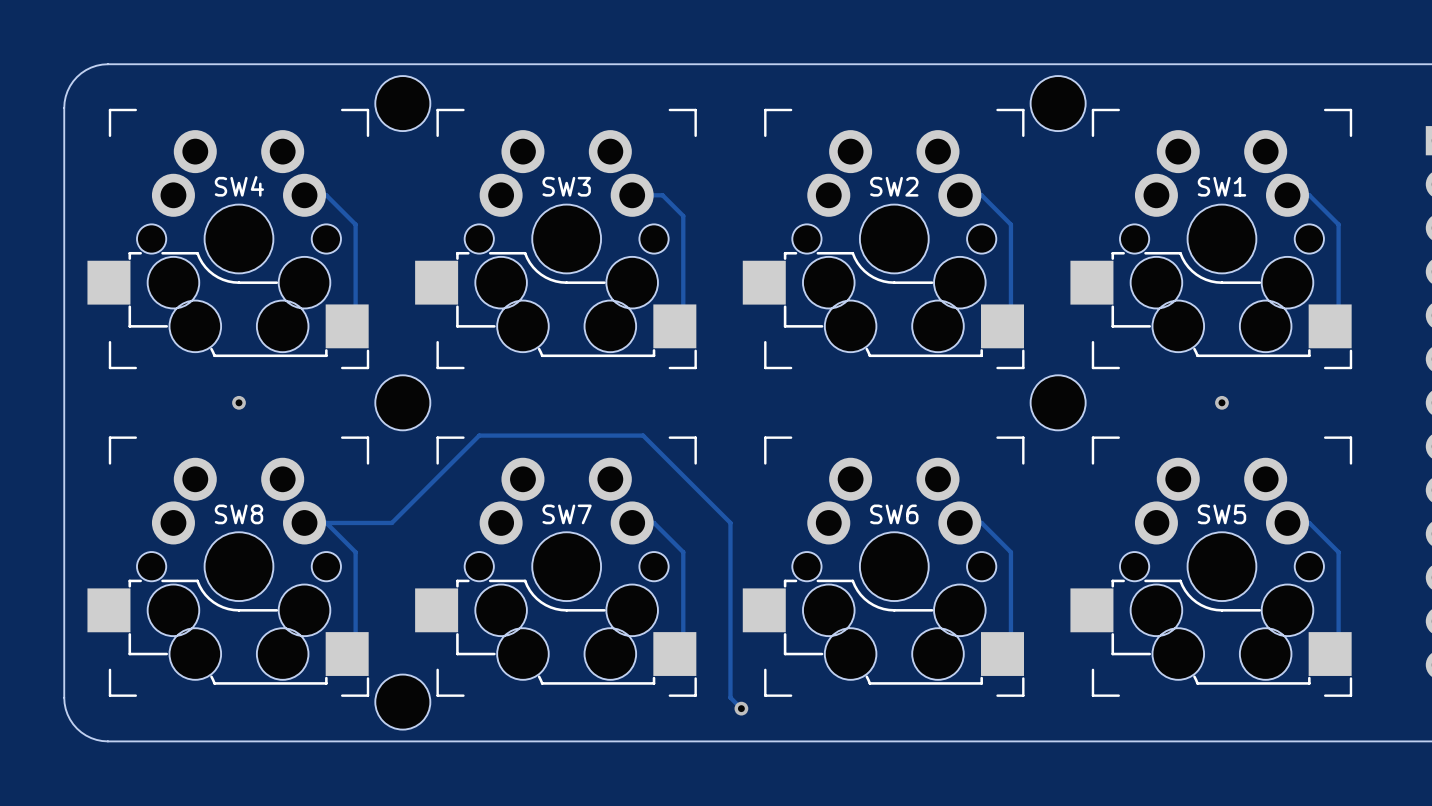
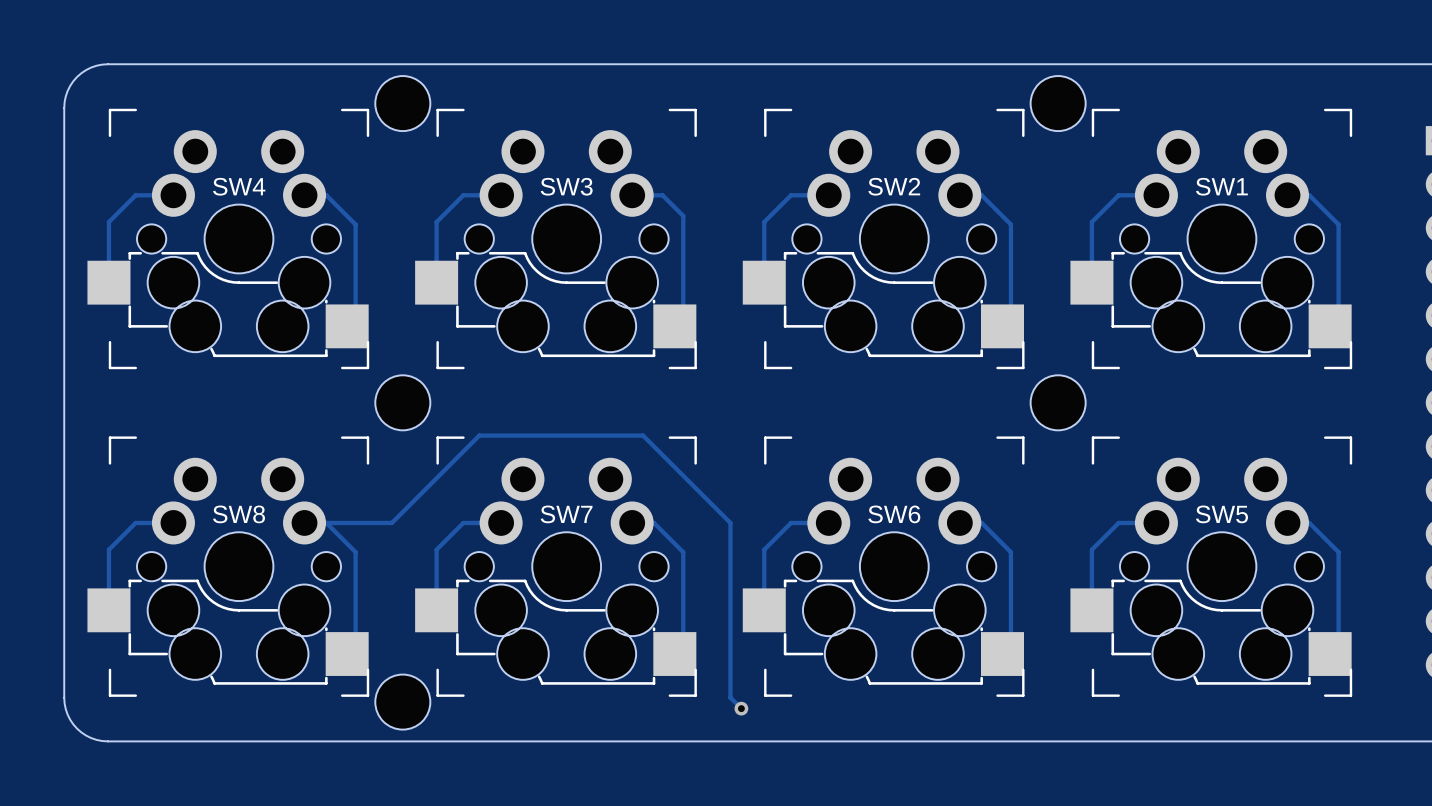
SW4 footprint: [87, 108, 370, 370] -> [87, 108, 370, 370]
SW3 footprint: [415, 108, 697, 370] -> [415, 108, 697, 370]
SW2 footprint: [742, 108, 1025, 370] -> [742, 108, 1025, 370]
SW1 footprint: [1070, 108, 1353, 370] -> [1070, 108, 1353, 370]
track: none -> (173, 195) (135, 195) (108, 222) (108, 282)
track: none -> (501, 195) (463, 195) (436, 222) (436, 282)
track: none -> (828, 195) (791, 195) (764, 222) (764, 282)
track: none -> (1156, 195) (1118, 195) (1091, 222) (1091, 282)
via: (238, 402) -> none
via: (1221, 402) -> none
SW8 footprint: [87, 436, 370, 697] -> [87, 436, 370, 697]
SW7 footprint: [415, 436, 697, 697] -> [415, 436, 697, 697]
SW6 footprint: [742, 436, 1025, 697] -> [742, 436, 1025, 697]
SW5 footprint: [1070, 436, 1353, 697] -> [1070, 436, 1353, 697]
track: none -> (173, 522) (135, 522) (108, 549) (108, 610)
track: none -> (501, 522) (463, 522) (436, 549) (436, 610)
track: none -> (828, 522) (791, 522) (764, 549) (764, 610)
track: none -> (1156, 522) (1118, 522) (1091, 549) (1091, 610)

